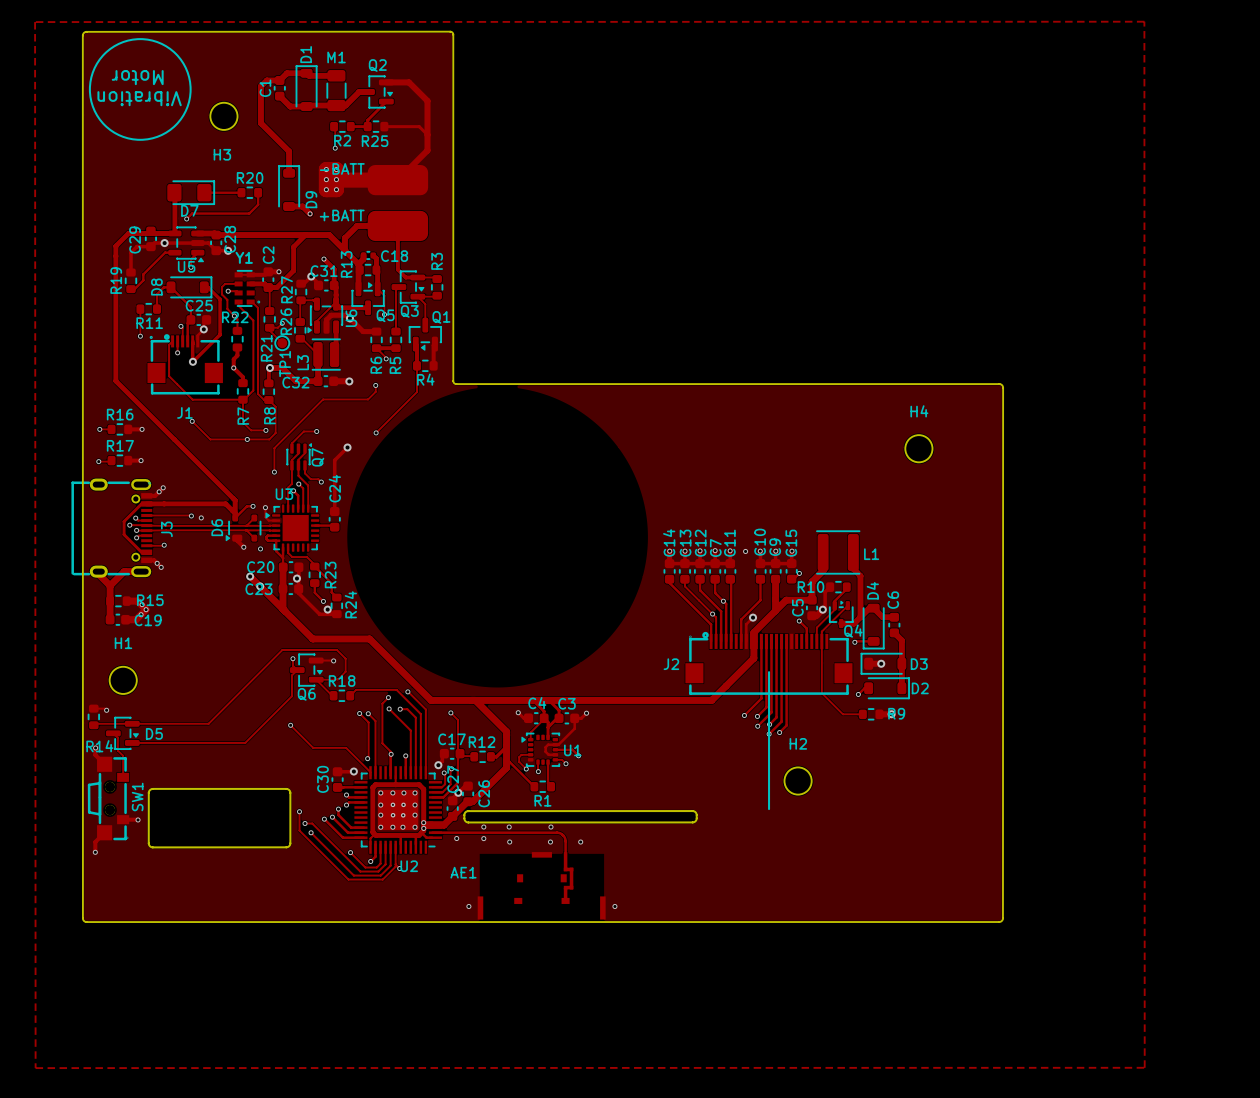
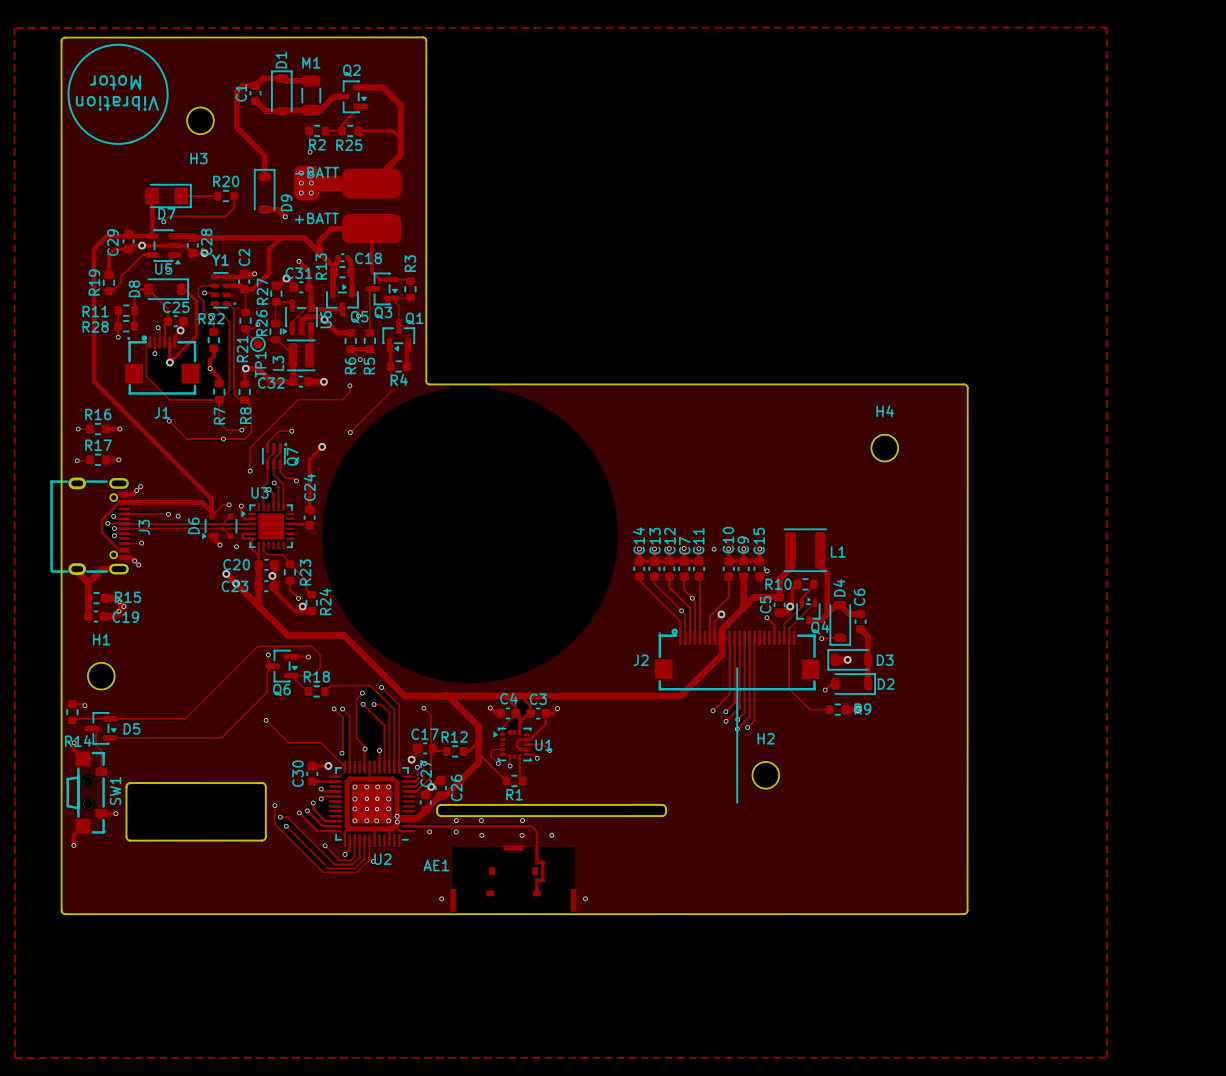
track: none -> (134, 310) (134, 326)
R11 name position: R11 (149, 323) -> R11 (95, 311)
R28: none -> (126, 326)

